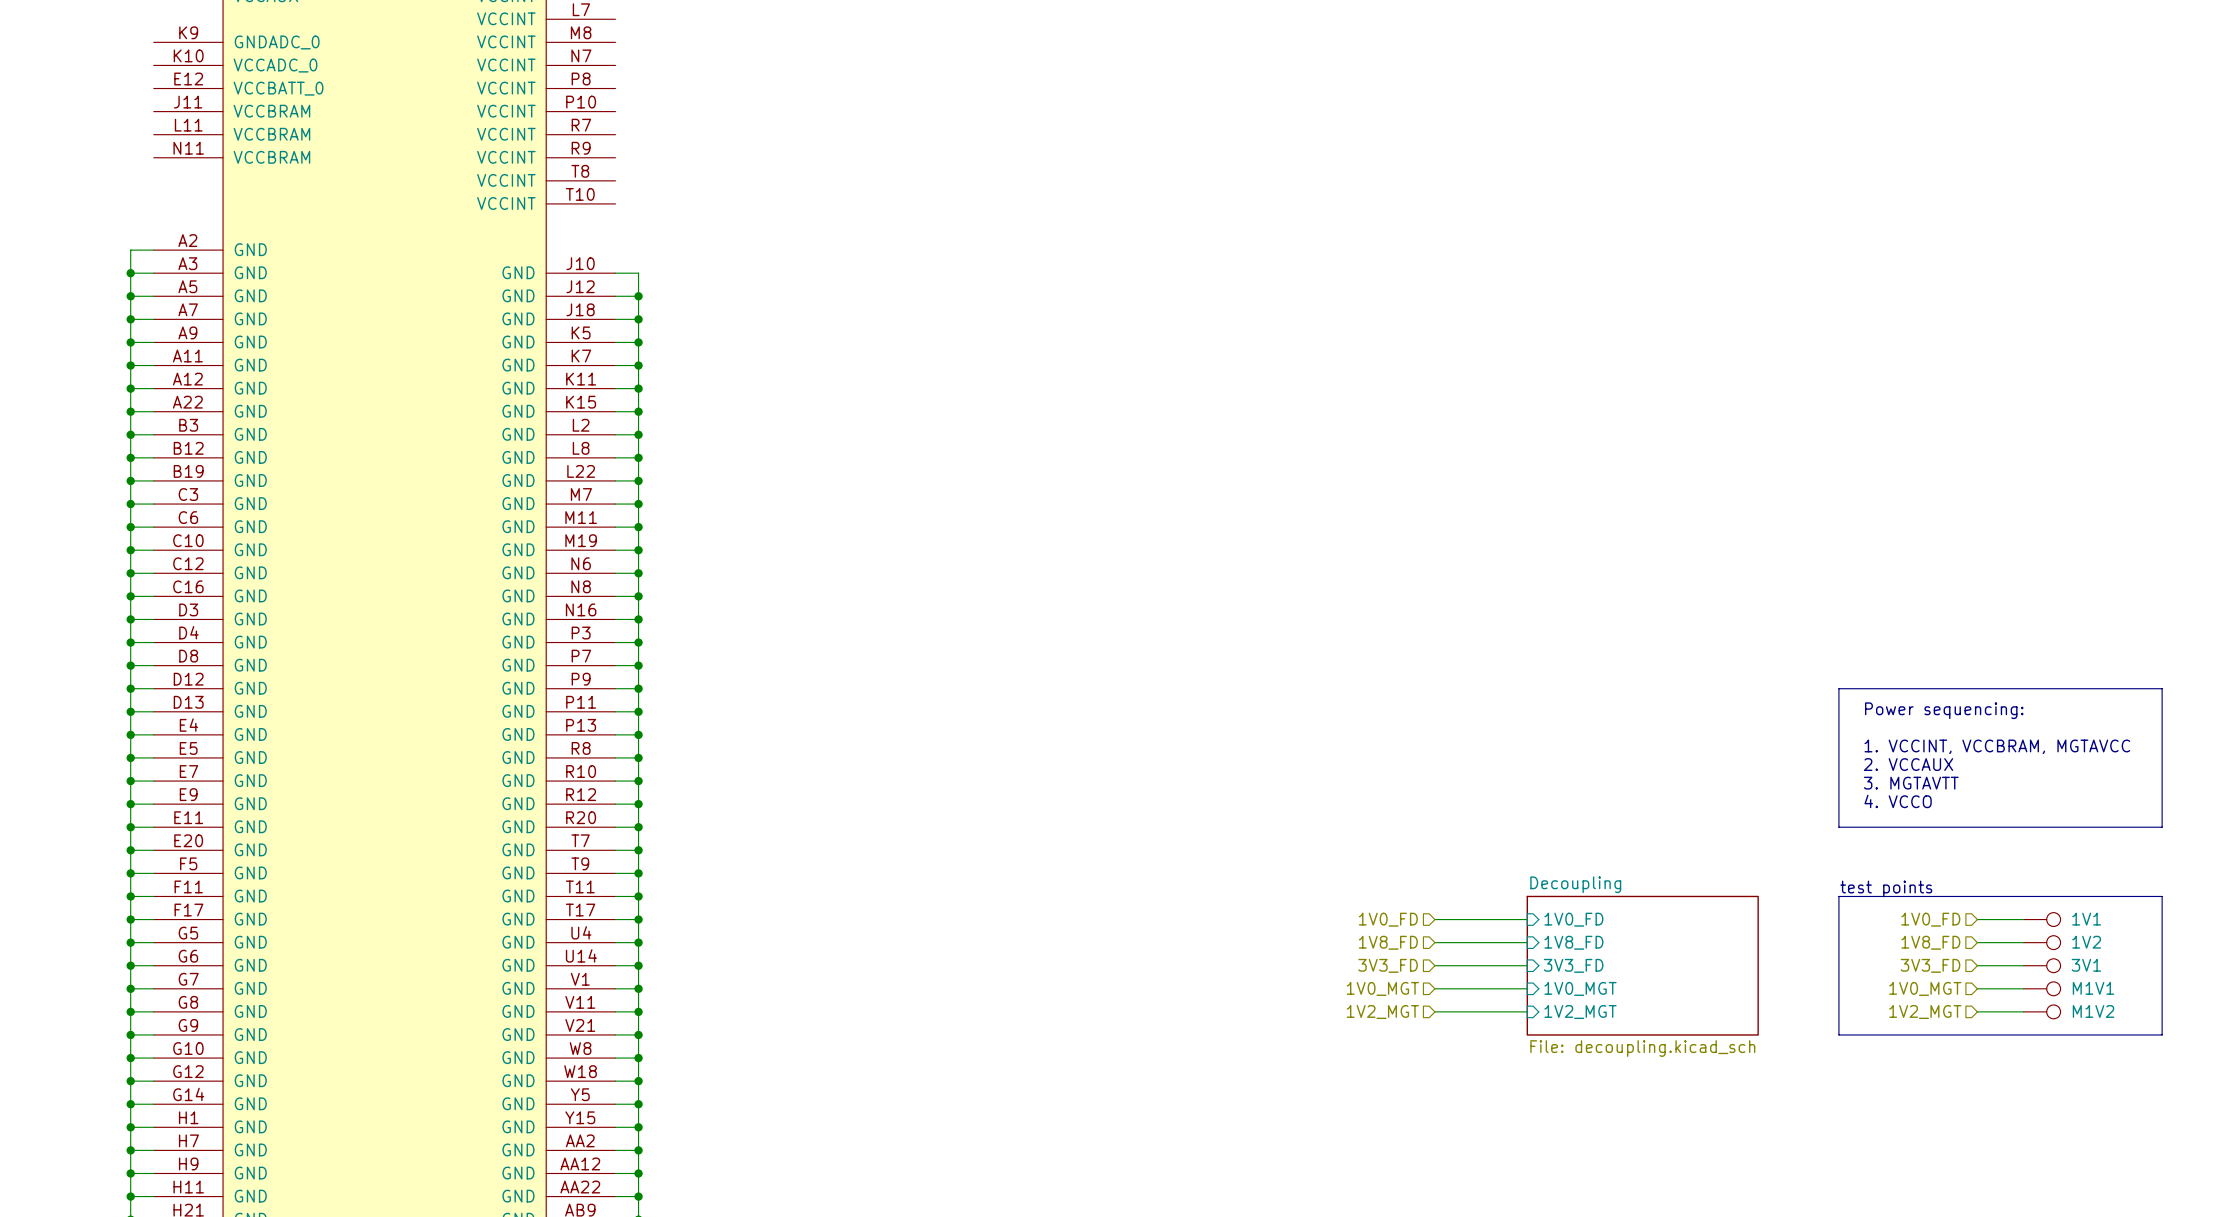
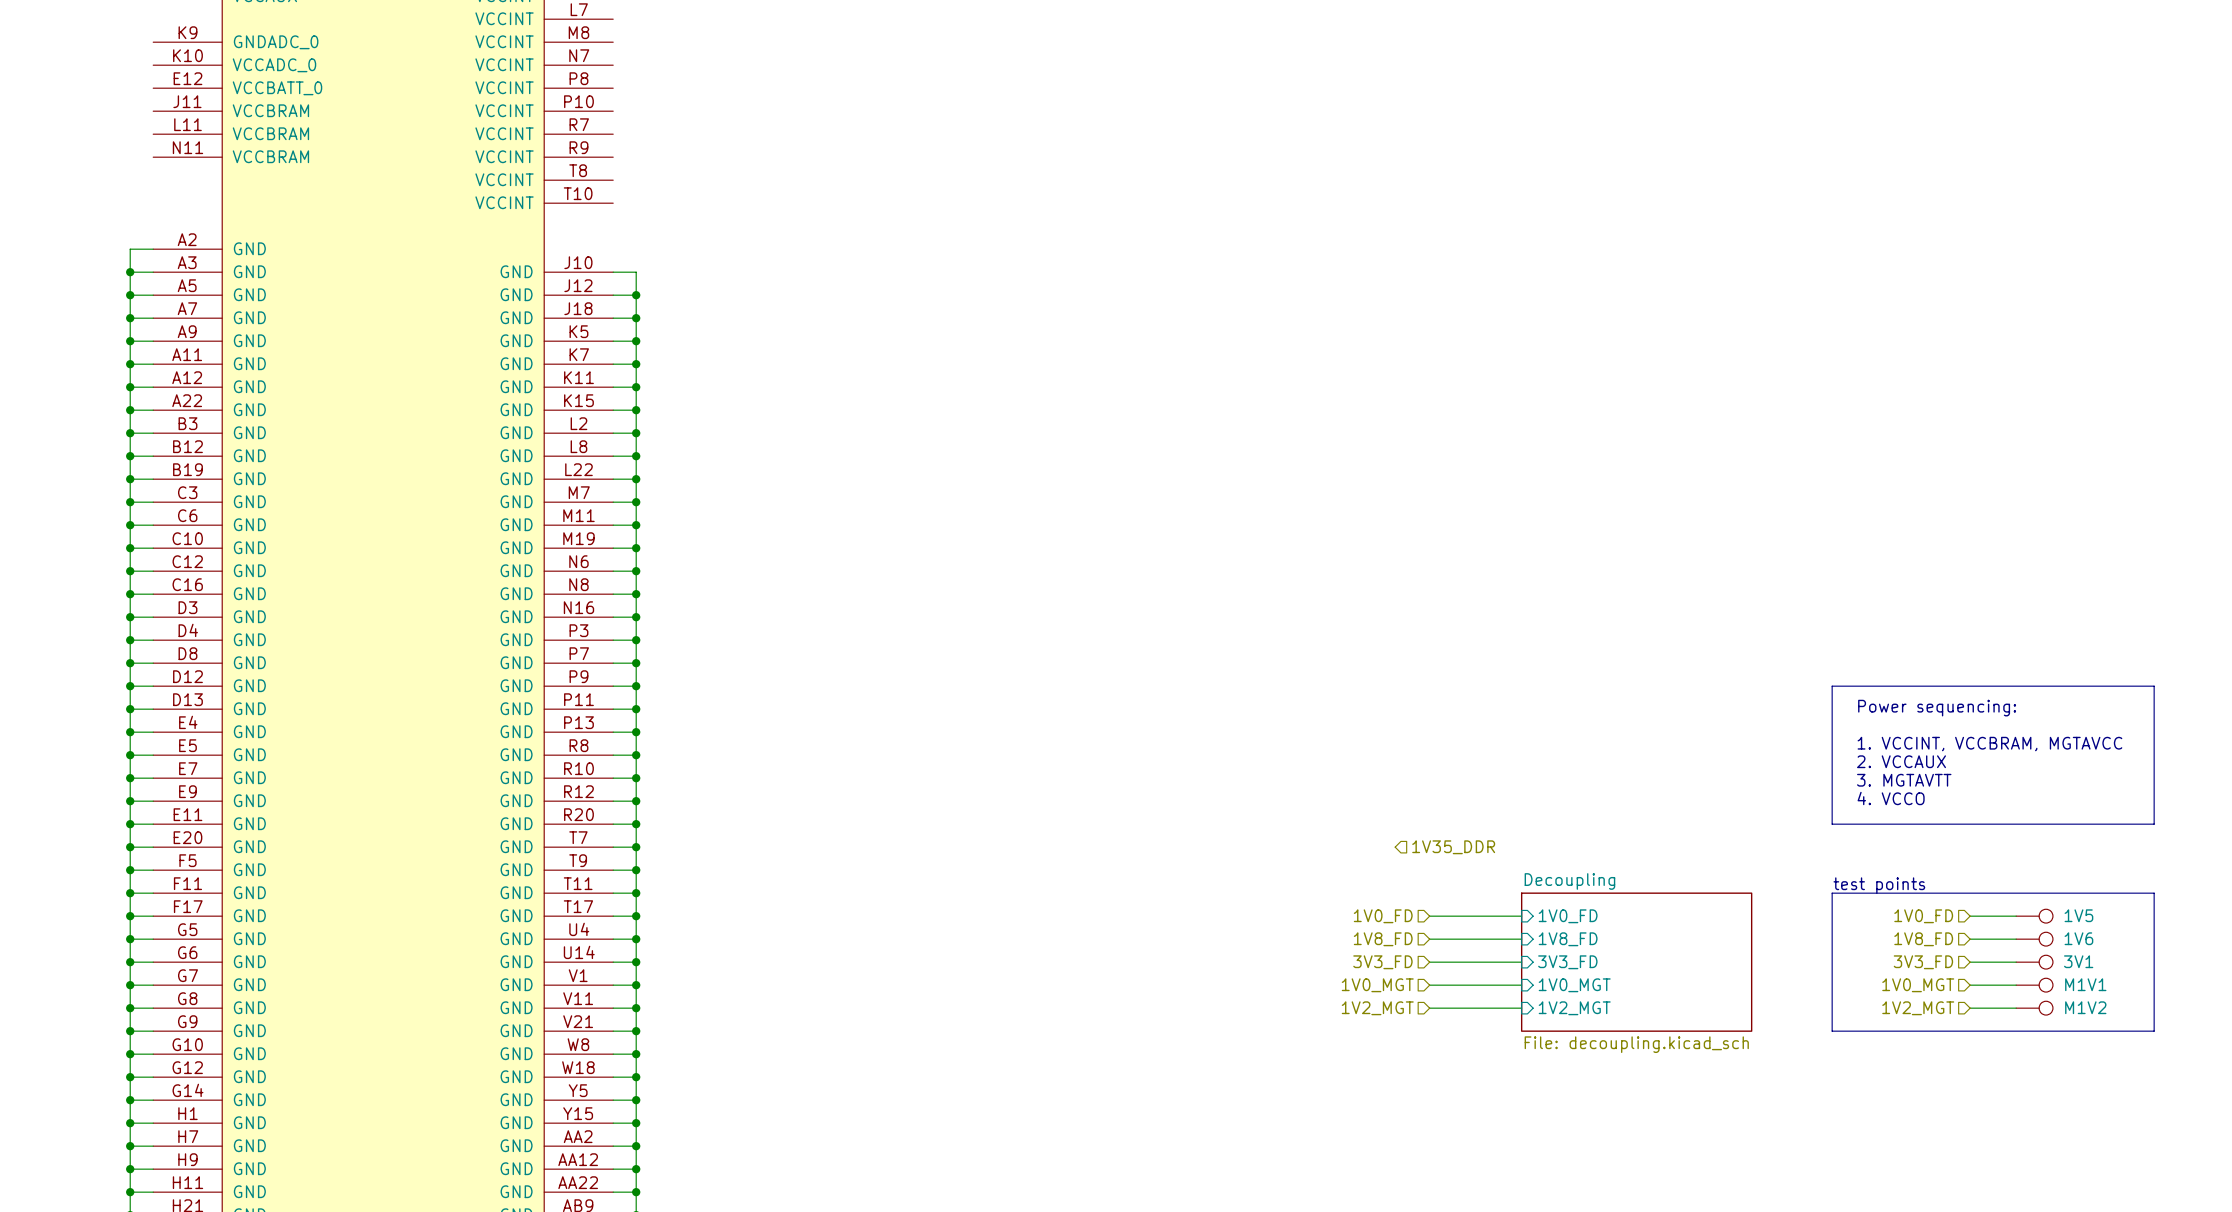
hierarchical label: none -> 1V35_DDR (1453, 847)
1V1 name: 1V1 (2086, 919) -> 1V5 (2078, 915)
1V2 name: 1V2 (2086, 942) -> 1V6 (2078, 938)

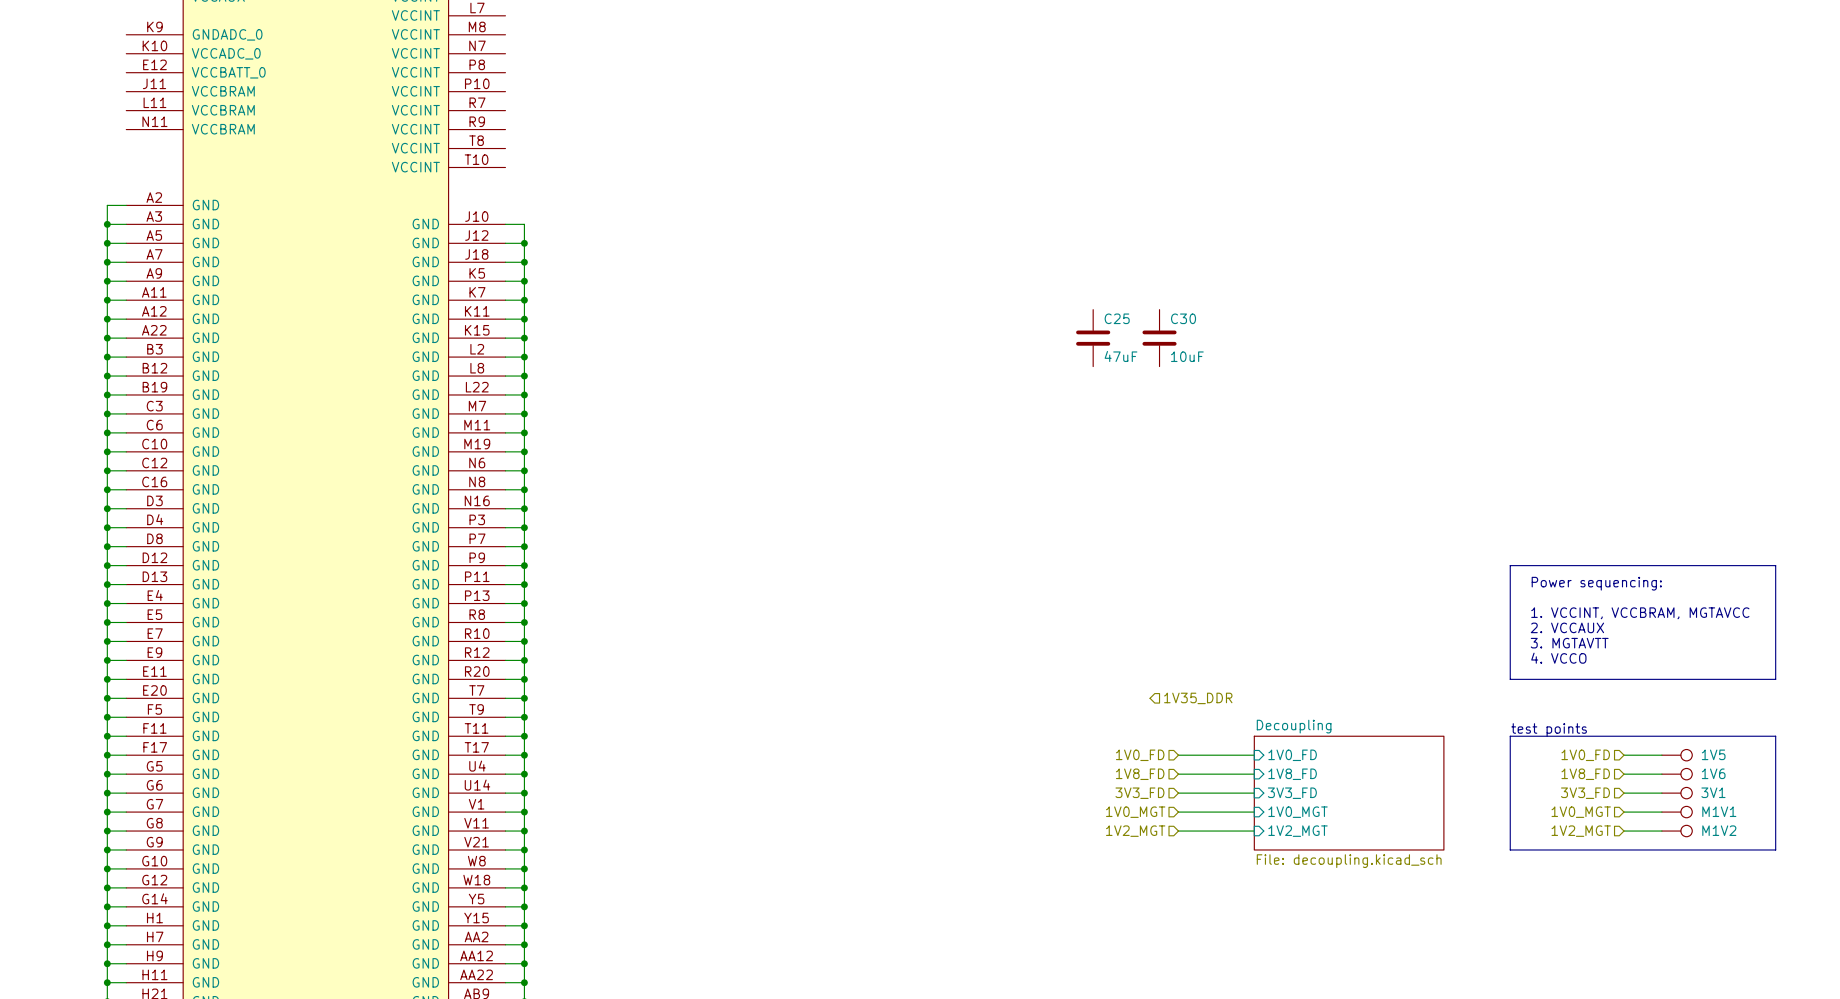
C25: none -> 47uF (1093, 338)
C30: none -> 10uF (1159, 338)

